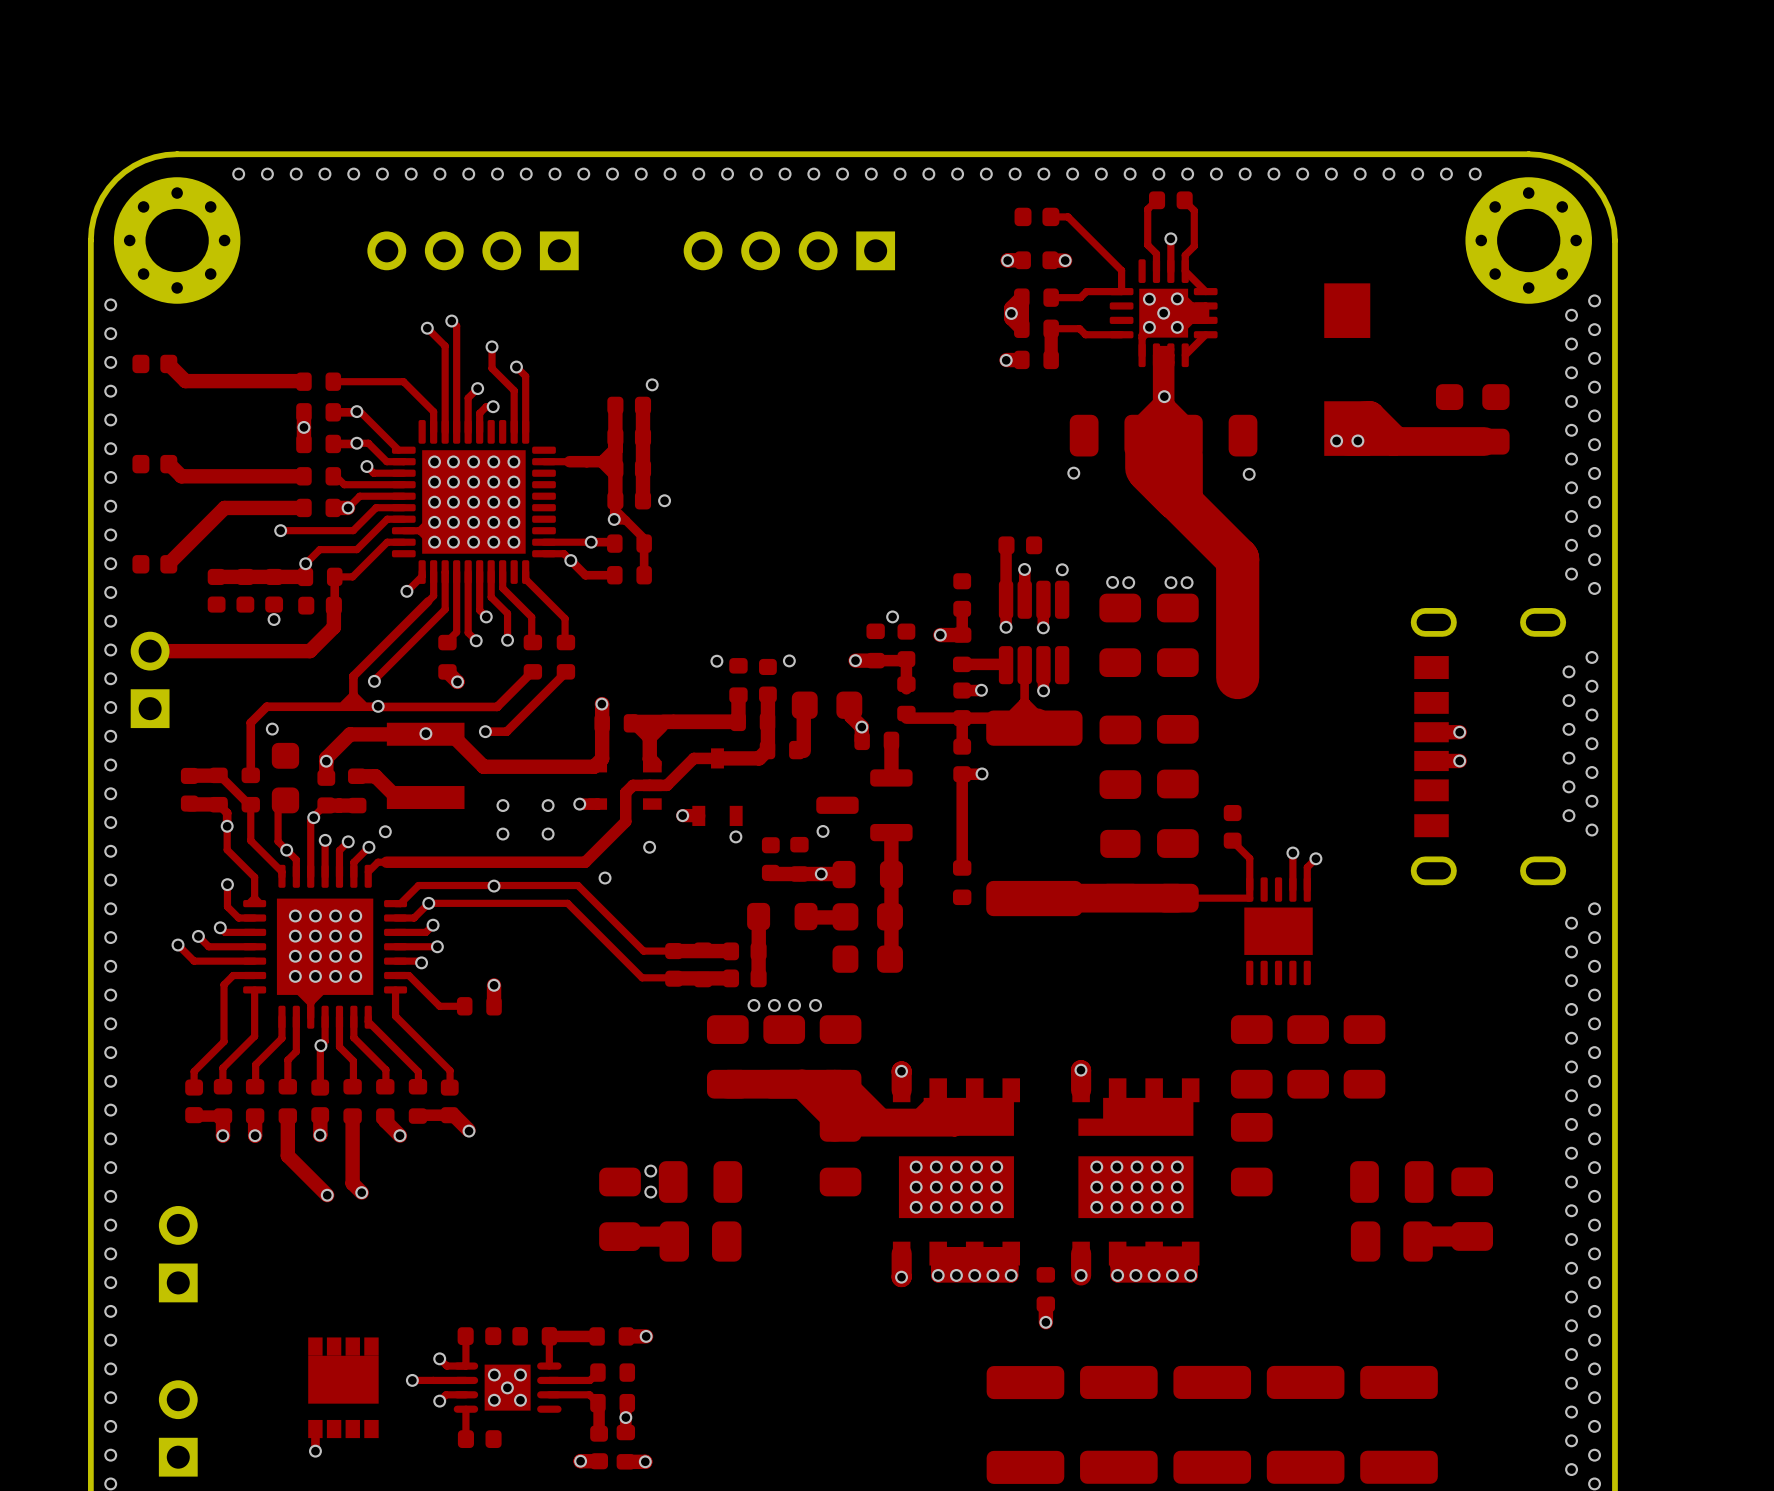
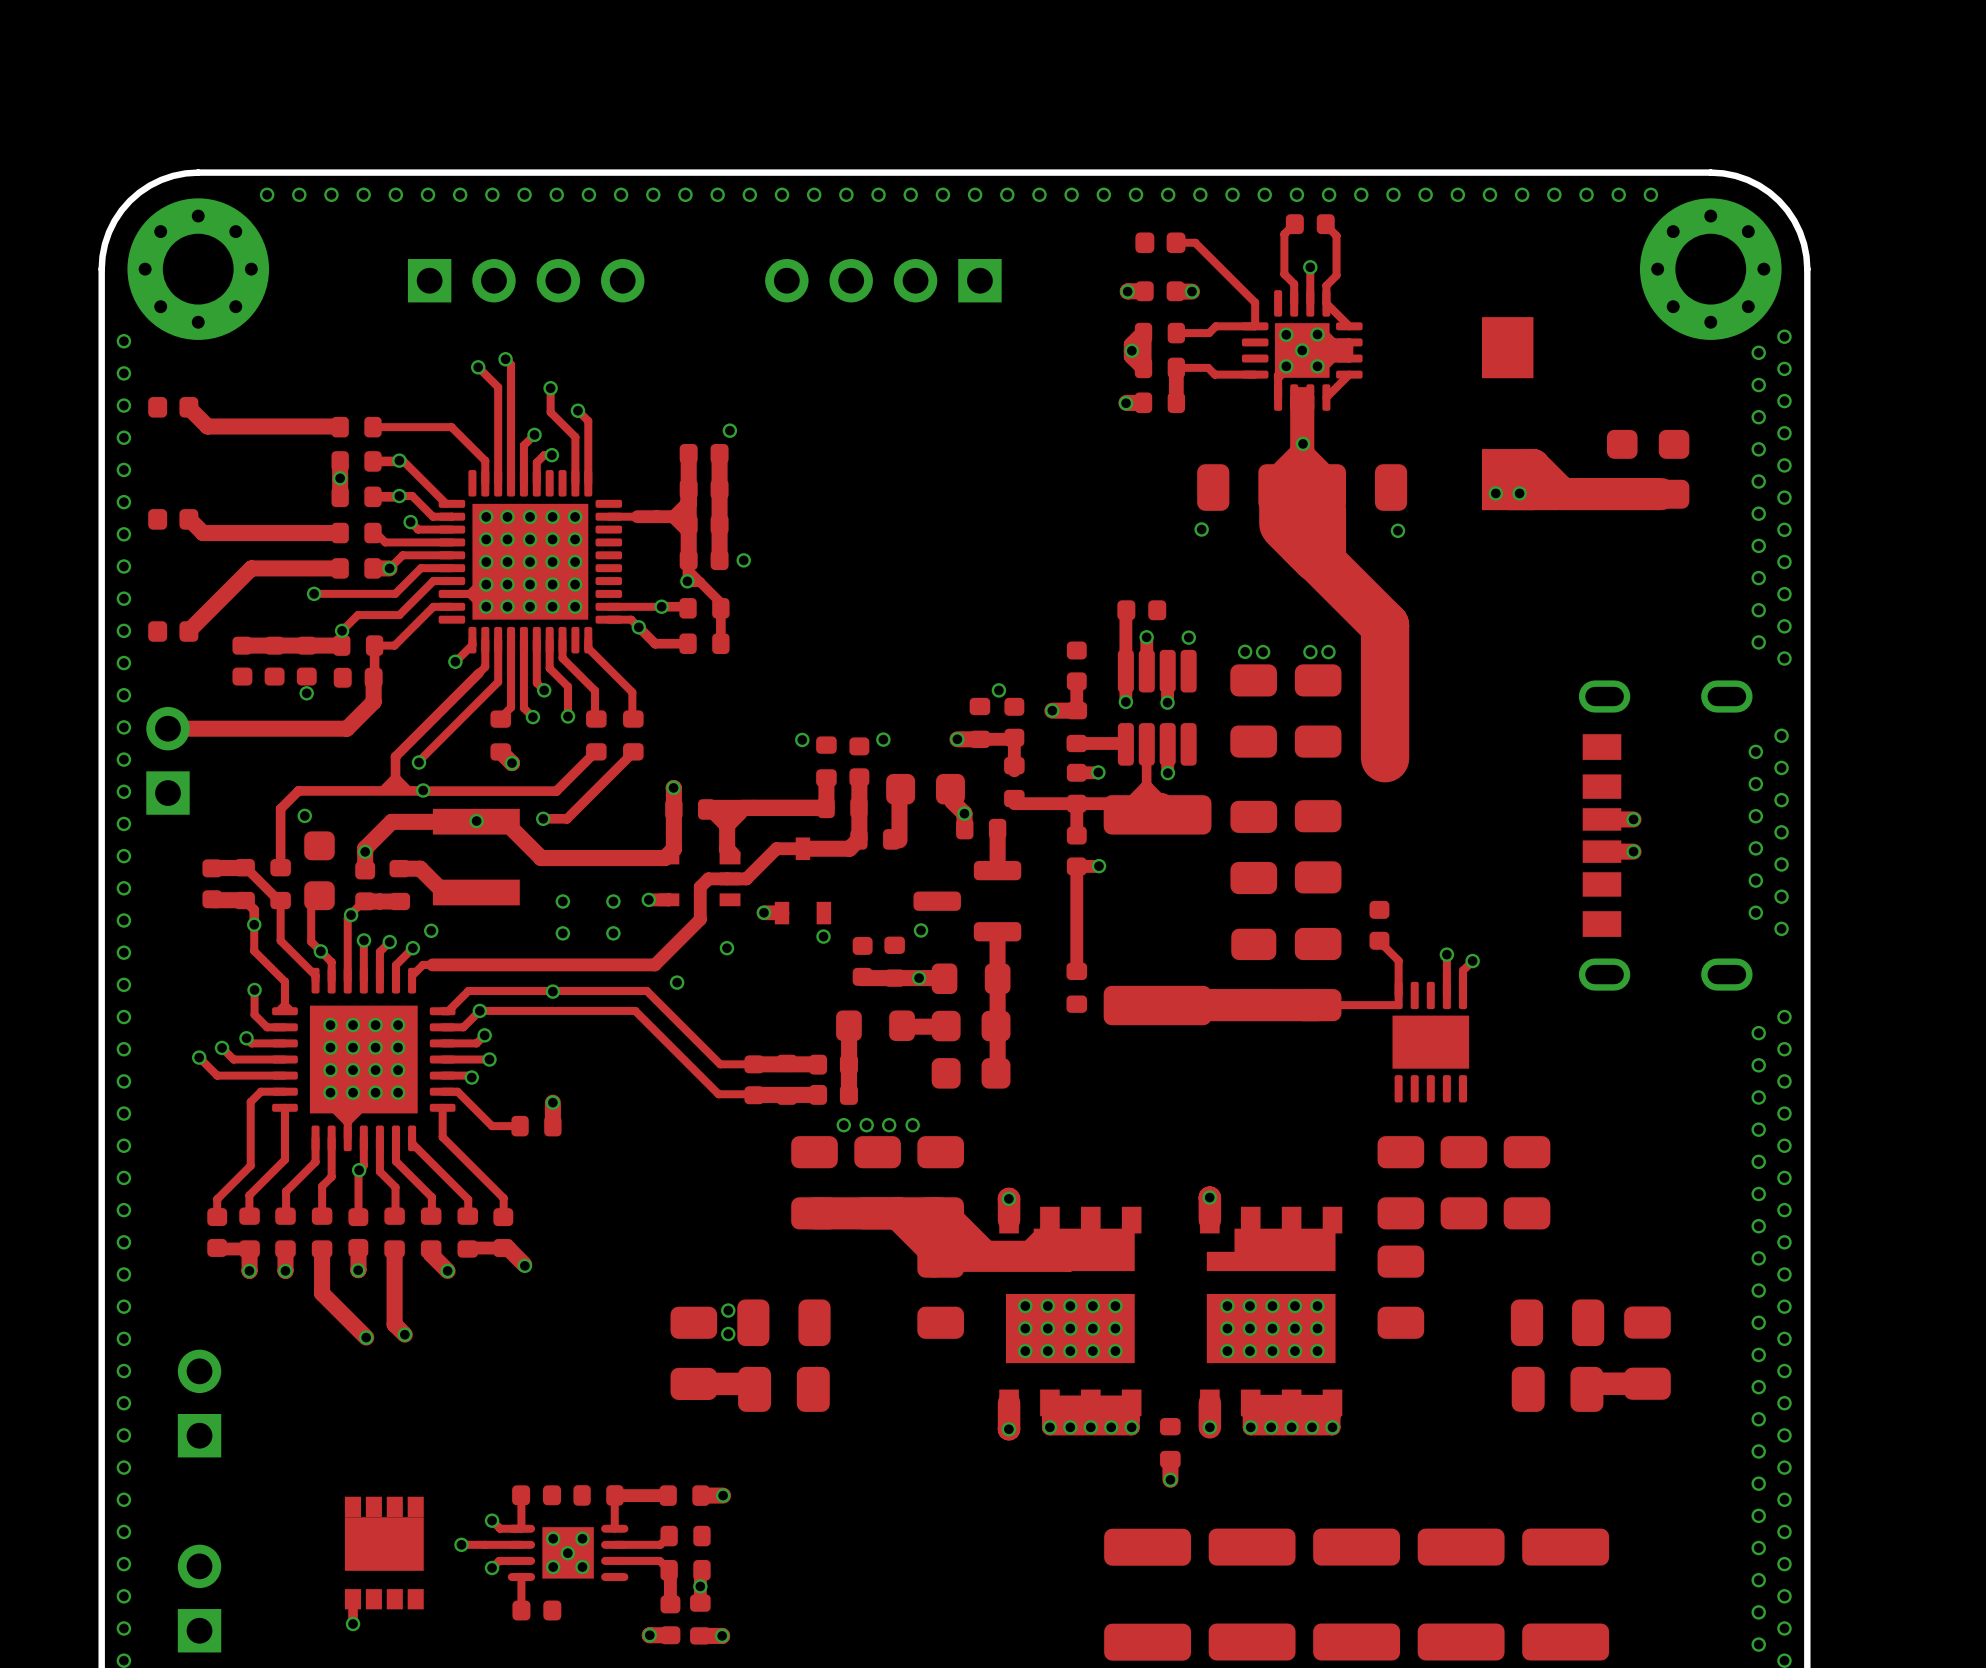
part rotation: 0° (473, 250) -> 180° (526, 280)

